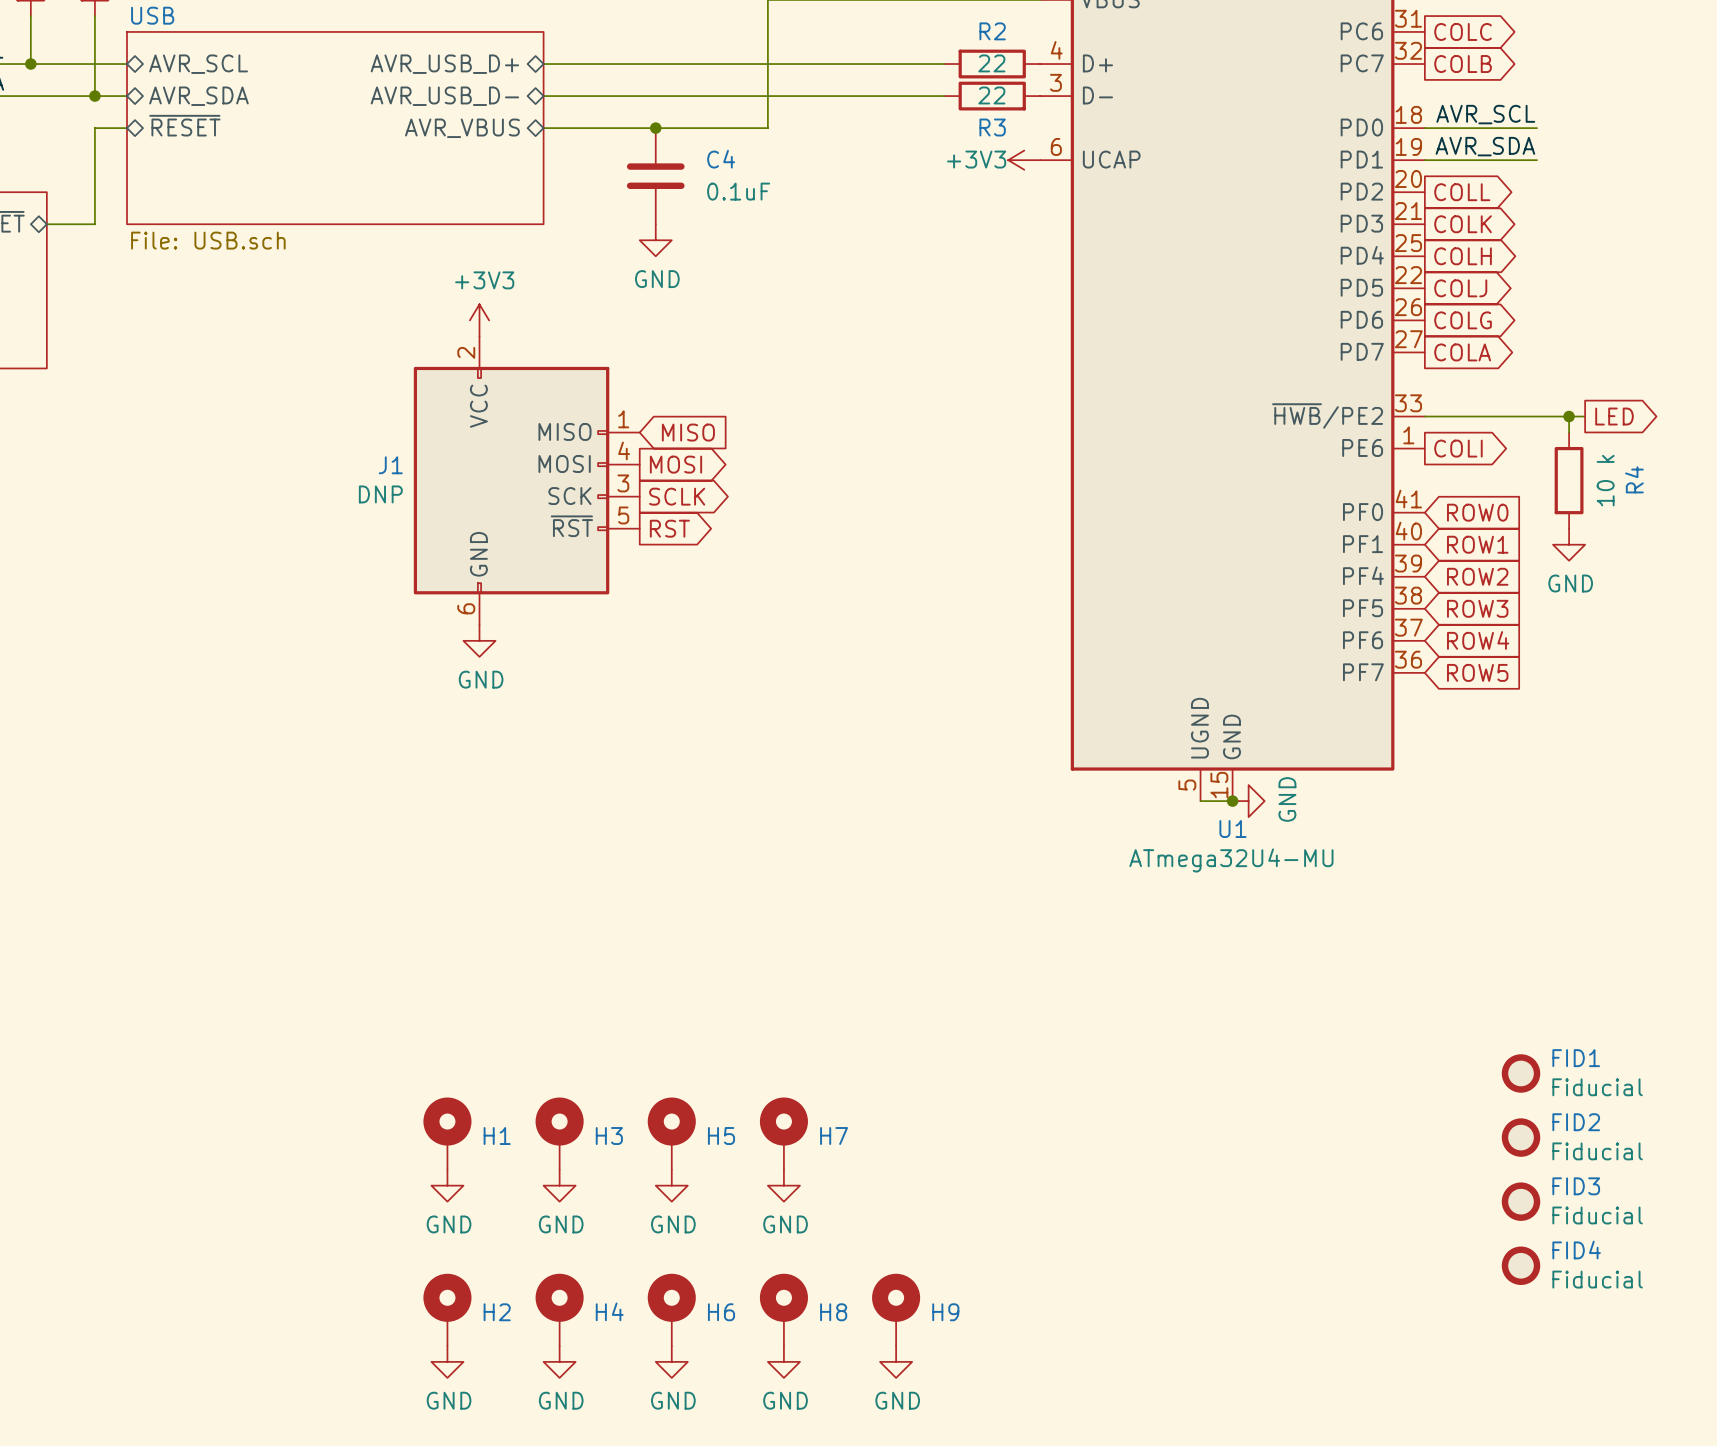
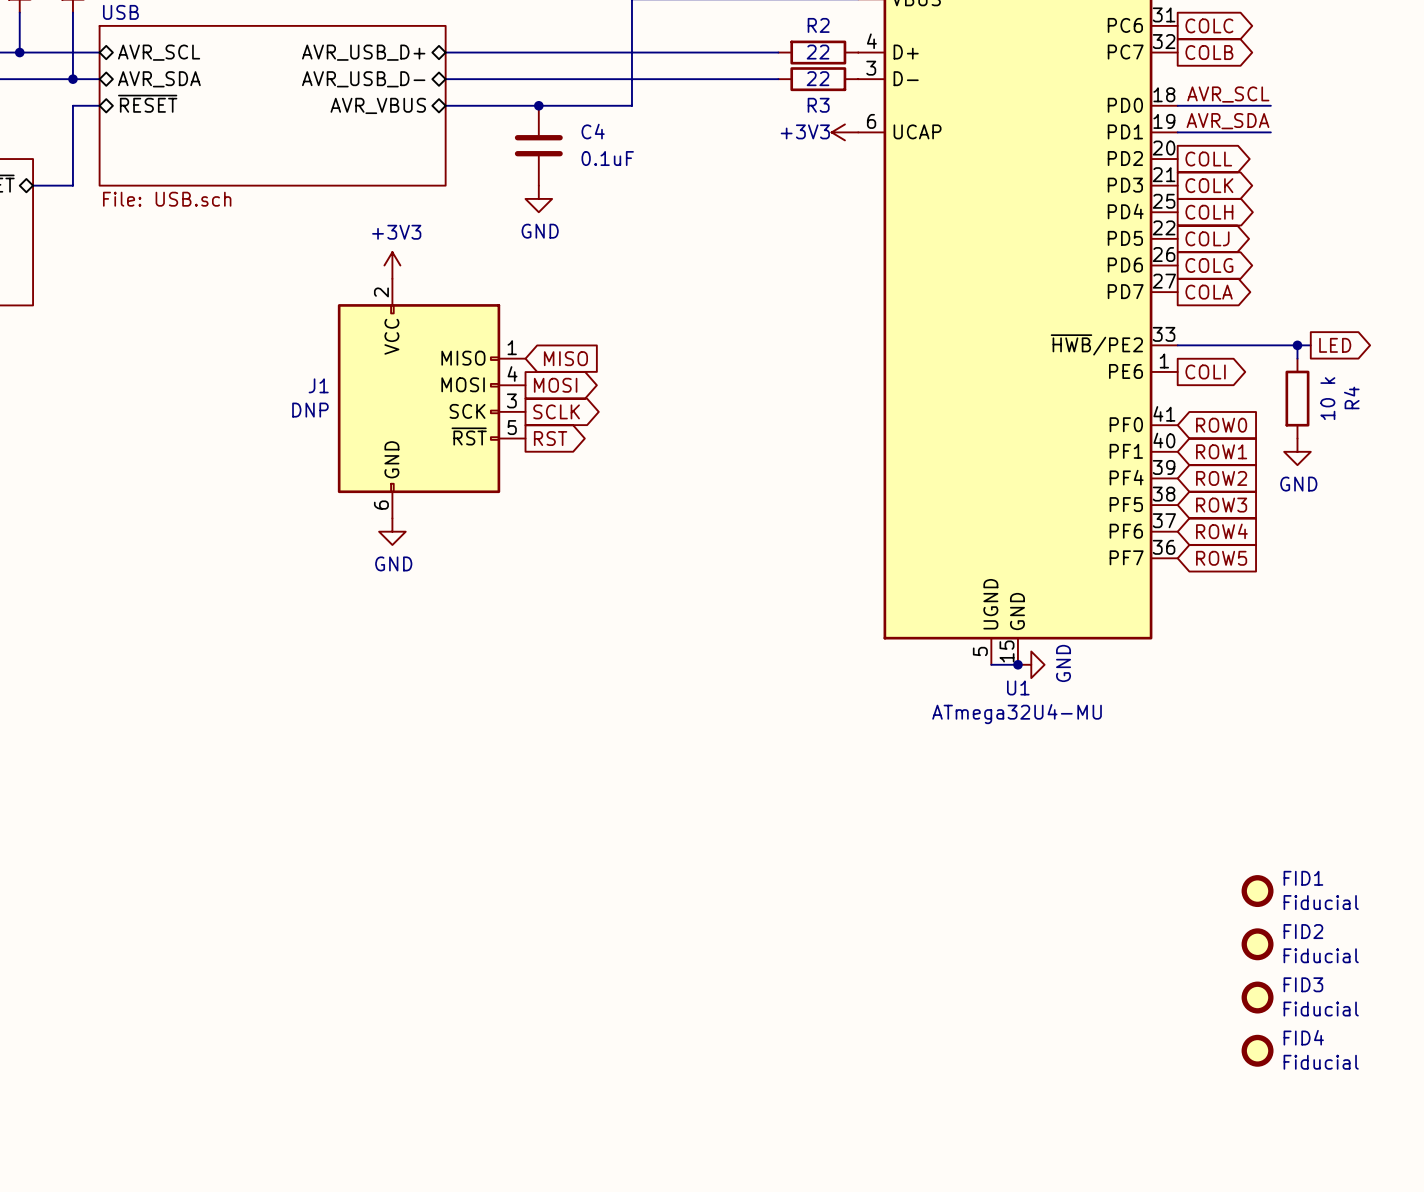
H1: (447, 1133) -> none
H3: (559, 1133) -> none
H5: (671, 1133) -> none
H7: (783, 1133) -> none
power symbol: GND (447, 1185) -> none
power symbol: GND (559, 1185) -> none
power symbol: GND (671, 1185) -> none
power symbol: GND (783, 1185) -> none
H2: (447, 1309) -> none
H4: (559, 1309) -> none
H6: (671, 1309) -> none
H8: (783, 1309) -> none
H9: (896, 1309) -> none
power symbol: GND (447, 1361) -> none
power symbol: GND (559, 1361) -> none
power symbol: GND (671, 1361) -> none
power symbol: GND (783, 1361) -> none
power symbol: GND (896, 1361) -> none

